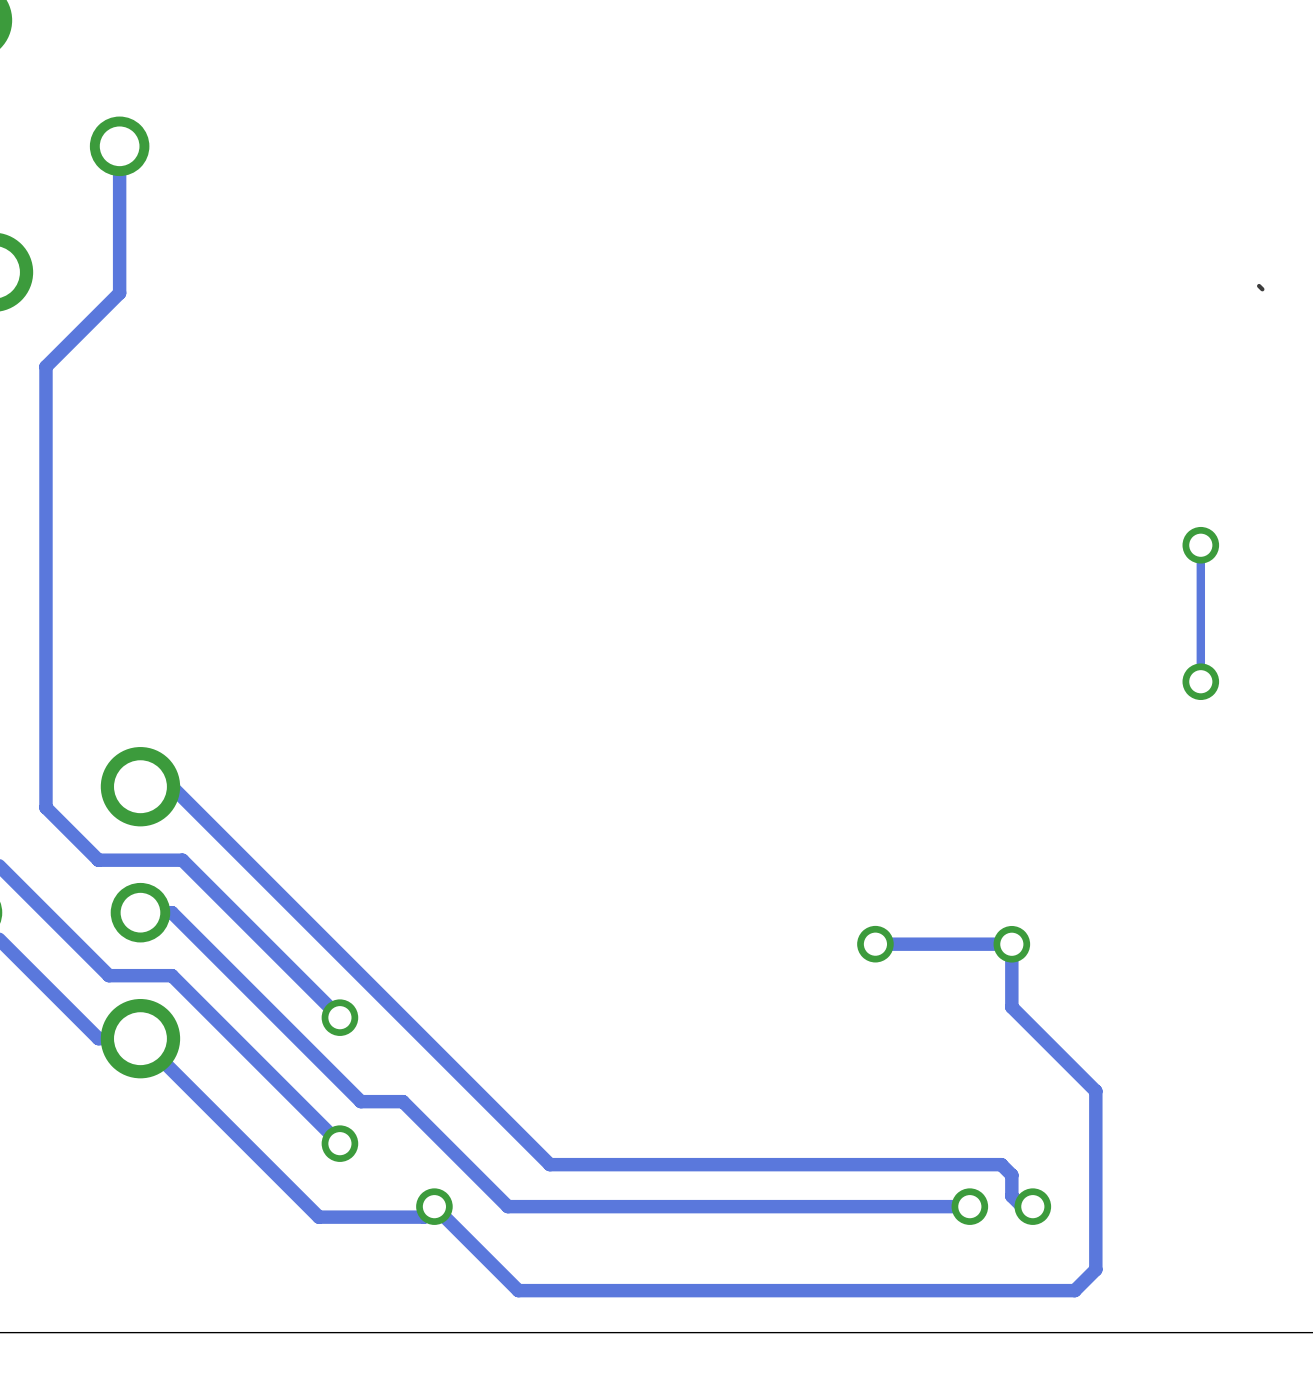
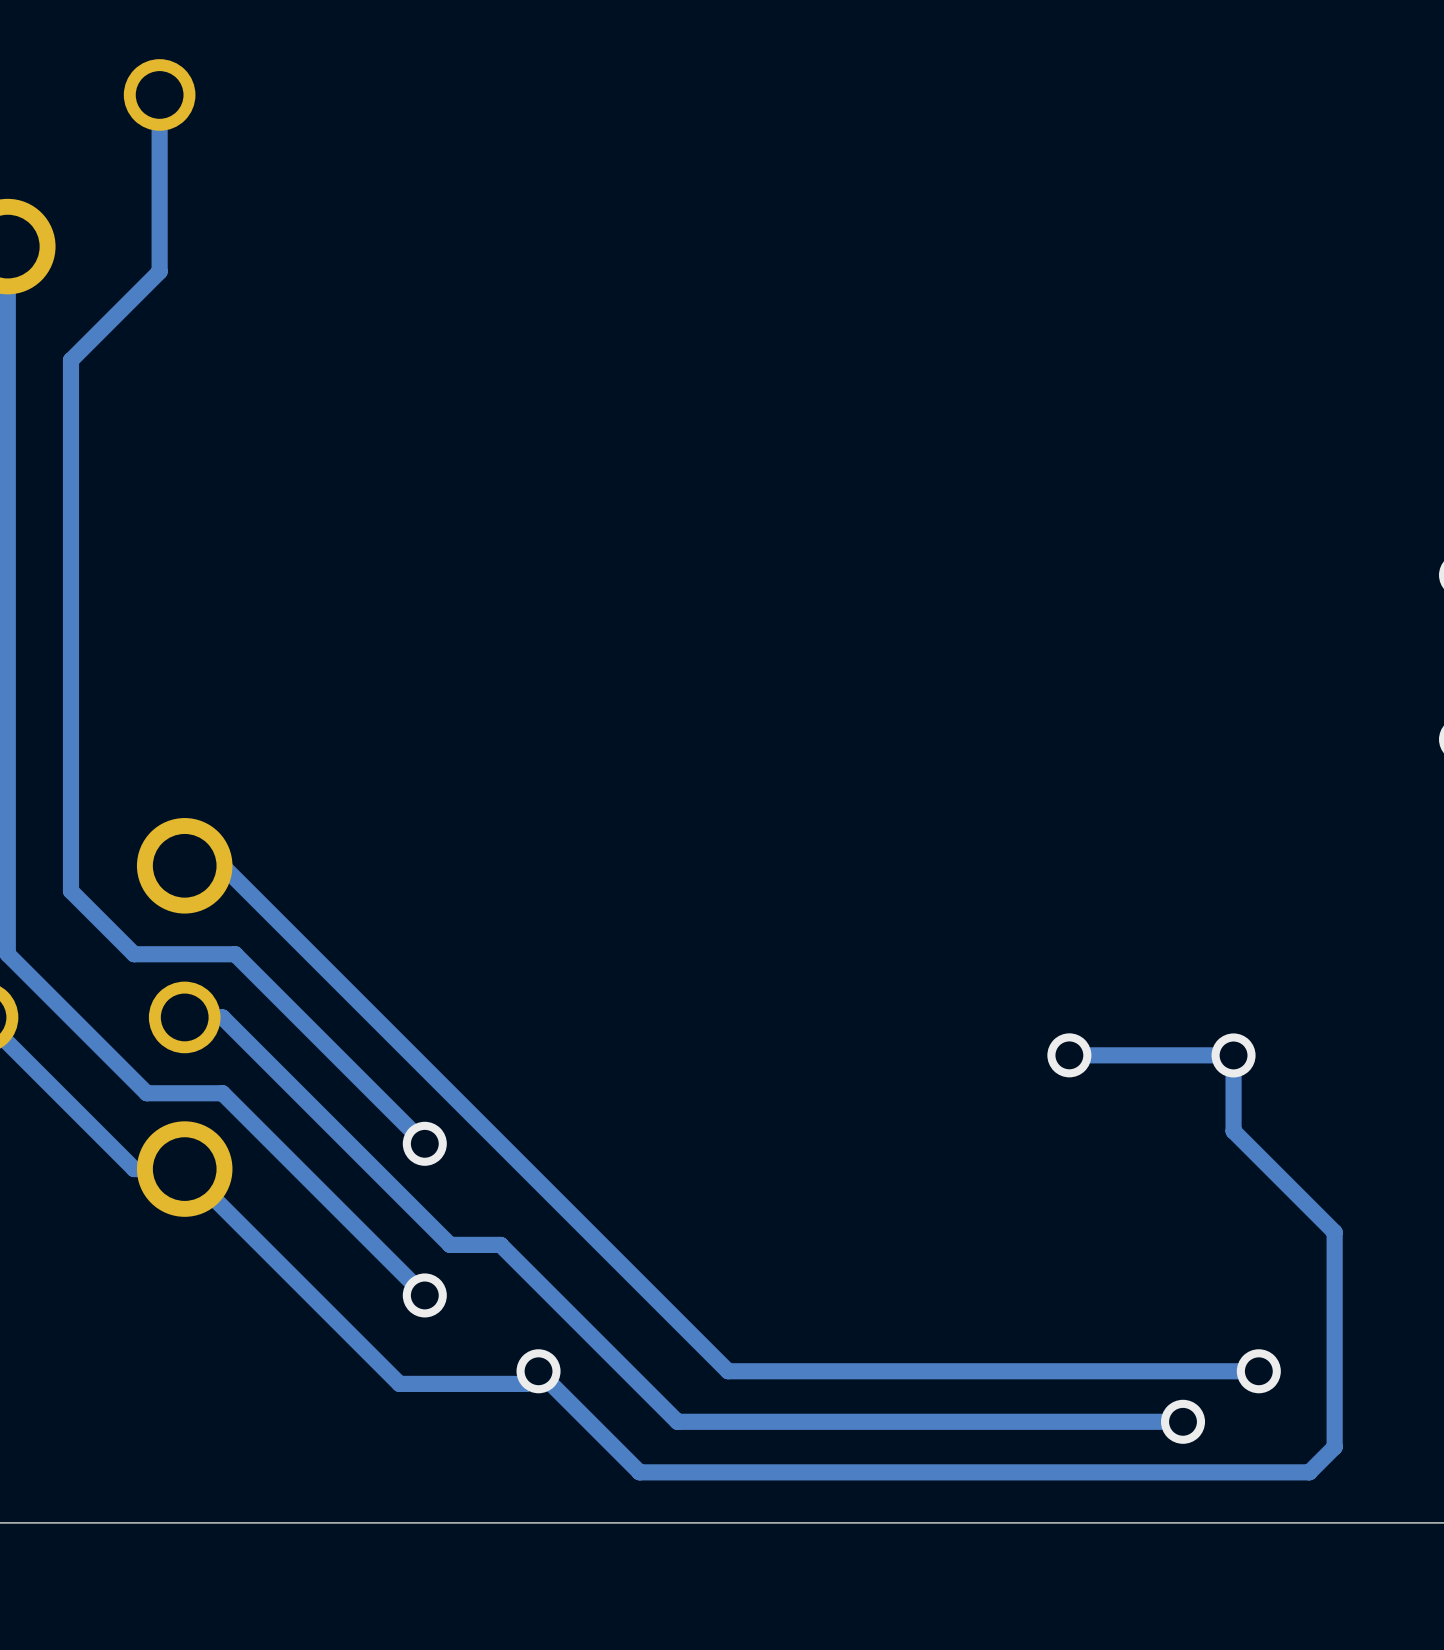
track: (549, 1164) (1001, 1164) (1011, 1175) (1011, 1196) (1022, 1206) -> (1183, 1371) (1246, 1371)
track: none -> (626, 1371) (677, 1421) (1183, 1421)
track: (591, 1206) (507, 1206) -> (728, 1371) (677, 1320)
via position: (969, 1206) -> (1183, 1421)

